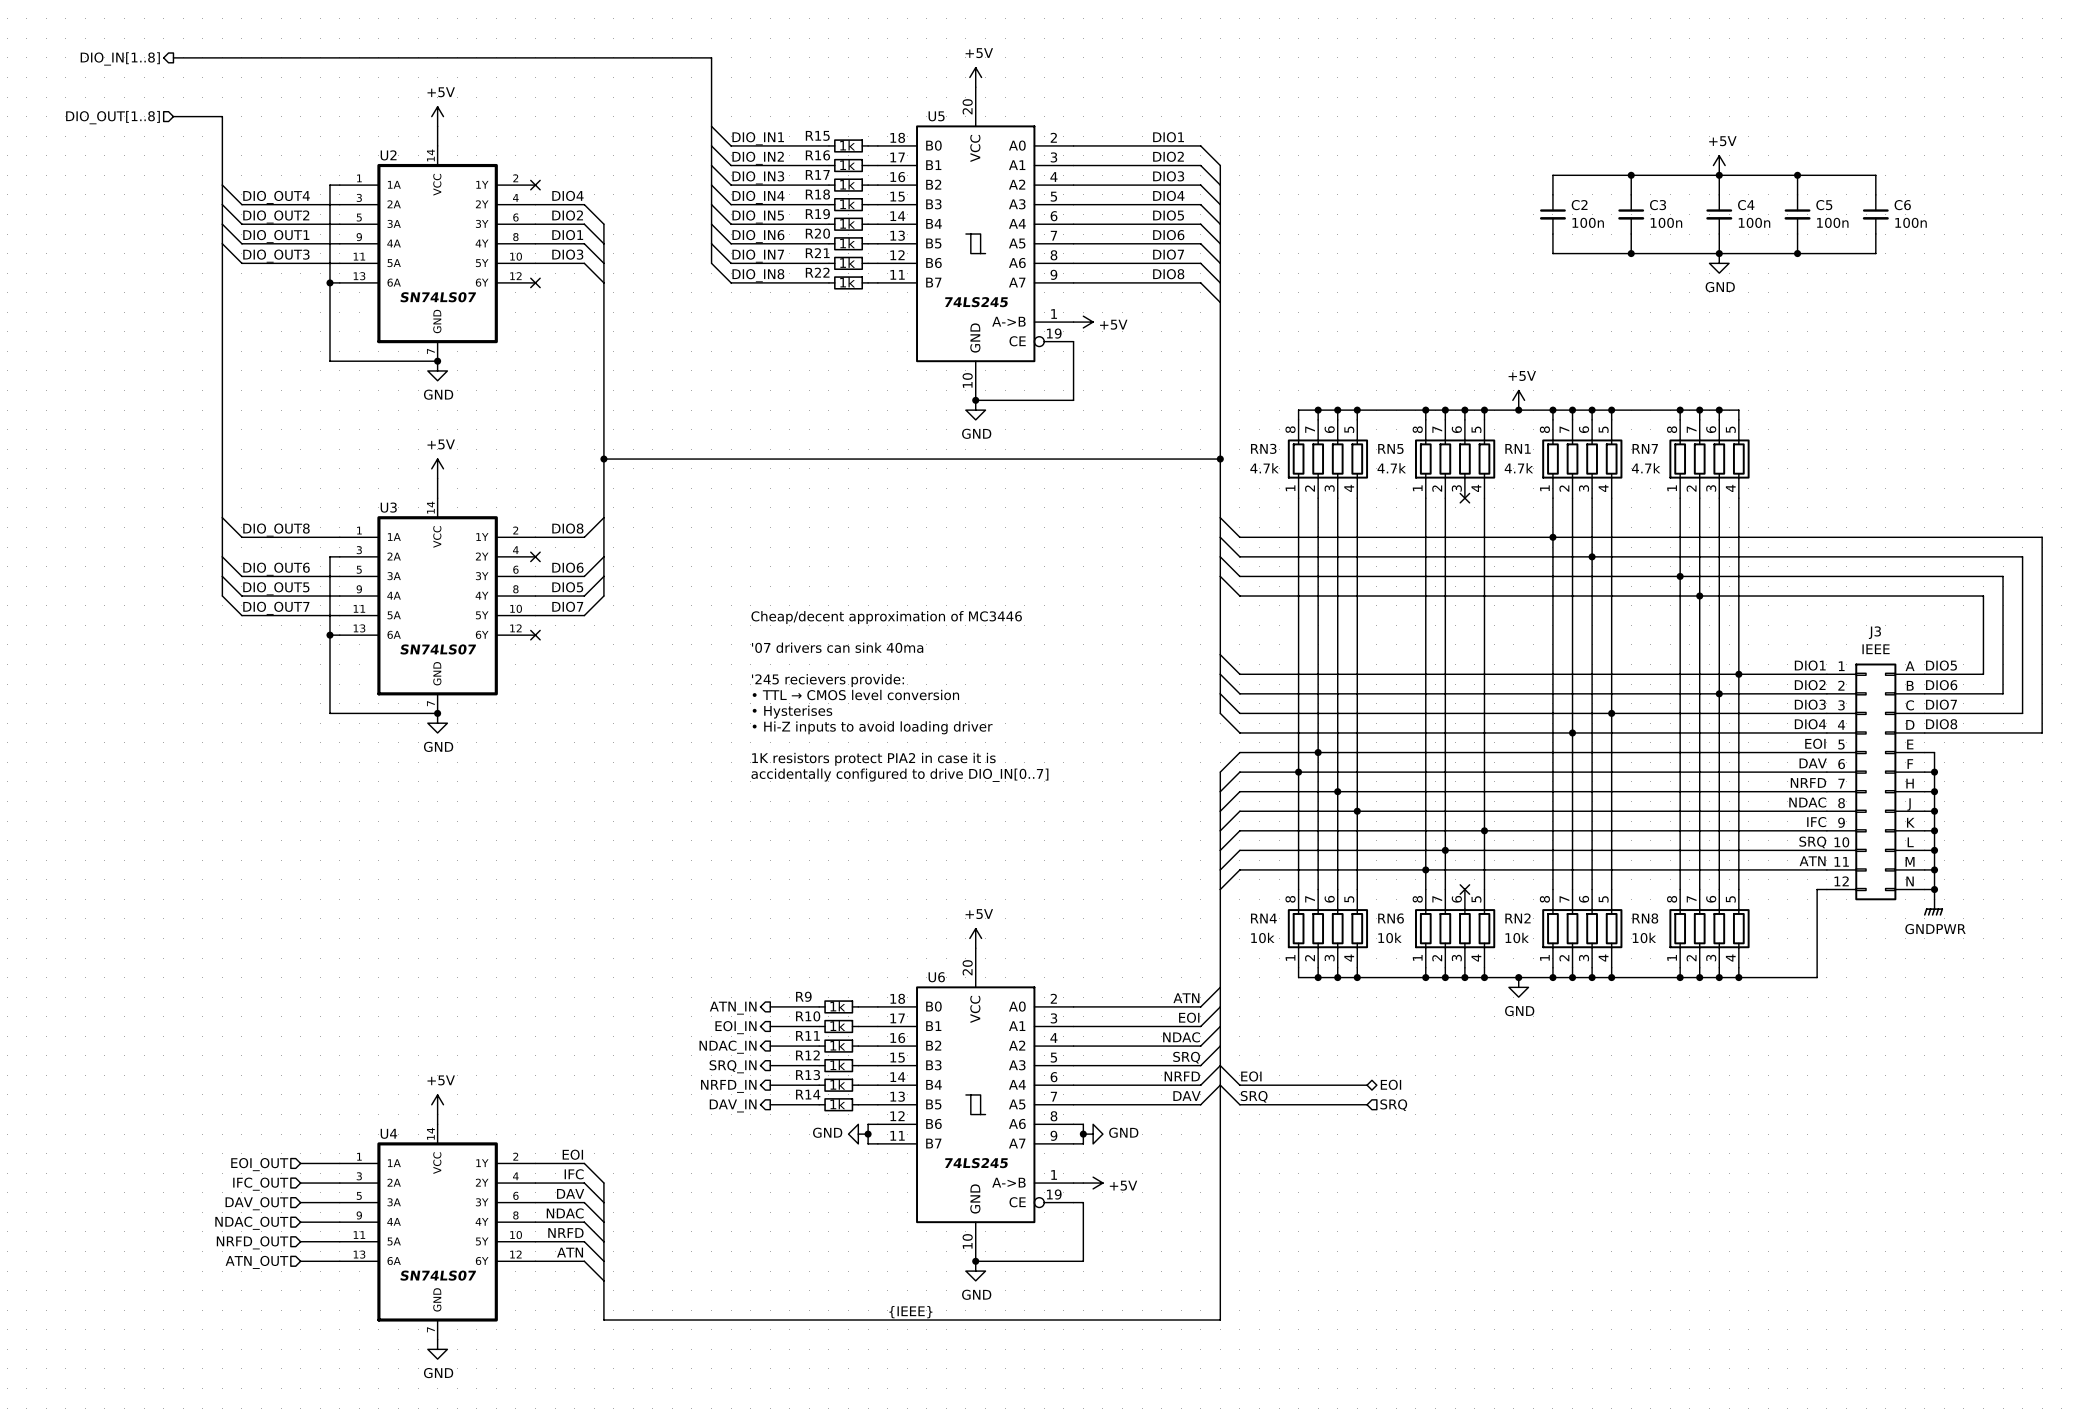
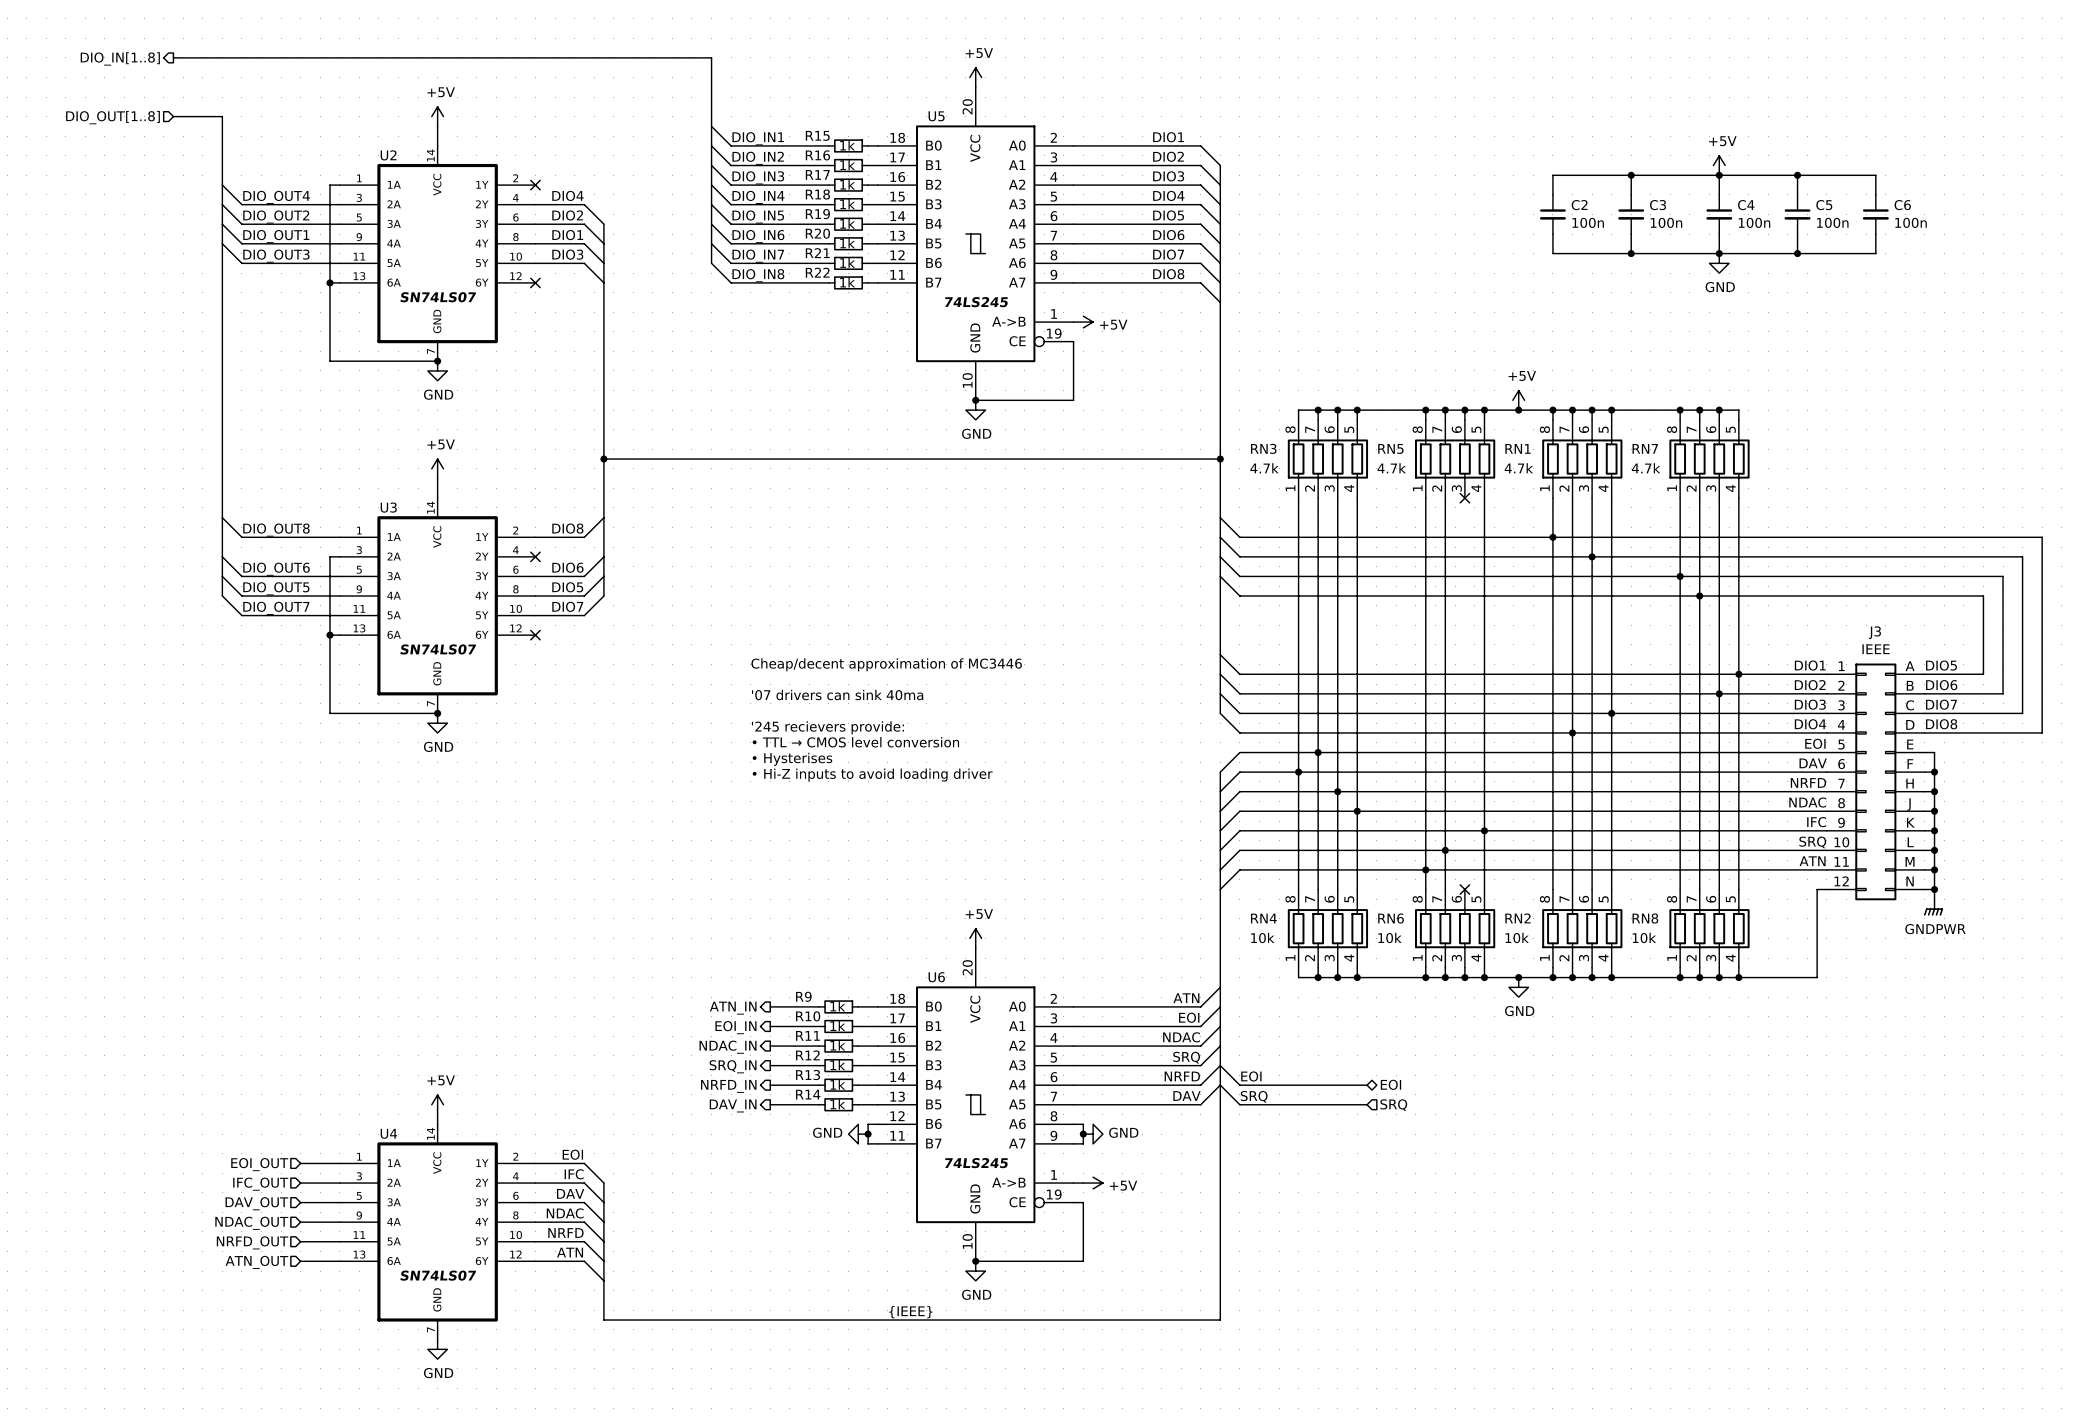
text position: Cheap/decent approximation of MC3446 (886, 617) -> Cheap/decent approximation of MC3446 (886, 664)
text: '07 drivers can sink 40ma (837, 647) -> none
text: '245 recievers provide: (828, 680) -> none
text: • TTL → CMOS level conversion (855, 695) -> '07 drivers can sink 40ma (837, 695)
text: • Hysterises (792, 712) -> none
text: • Hi-Z inputs to avoid loading driver (872, 727) -> '245 recievers provide: (828, 727)
text: none -> • TTL → CMOS level conversion (855, 742)
text: 1K resistors protect PIA2 in case it is (873, 759) -> • Hysterises (792, 759)
text: accidentally configured to drive DIO_IN[0..7] (899, 775) -> • Hi-Z inputs to avoid loading driver (872, 775)

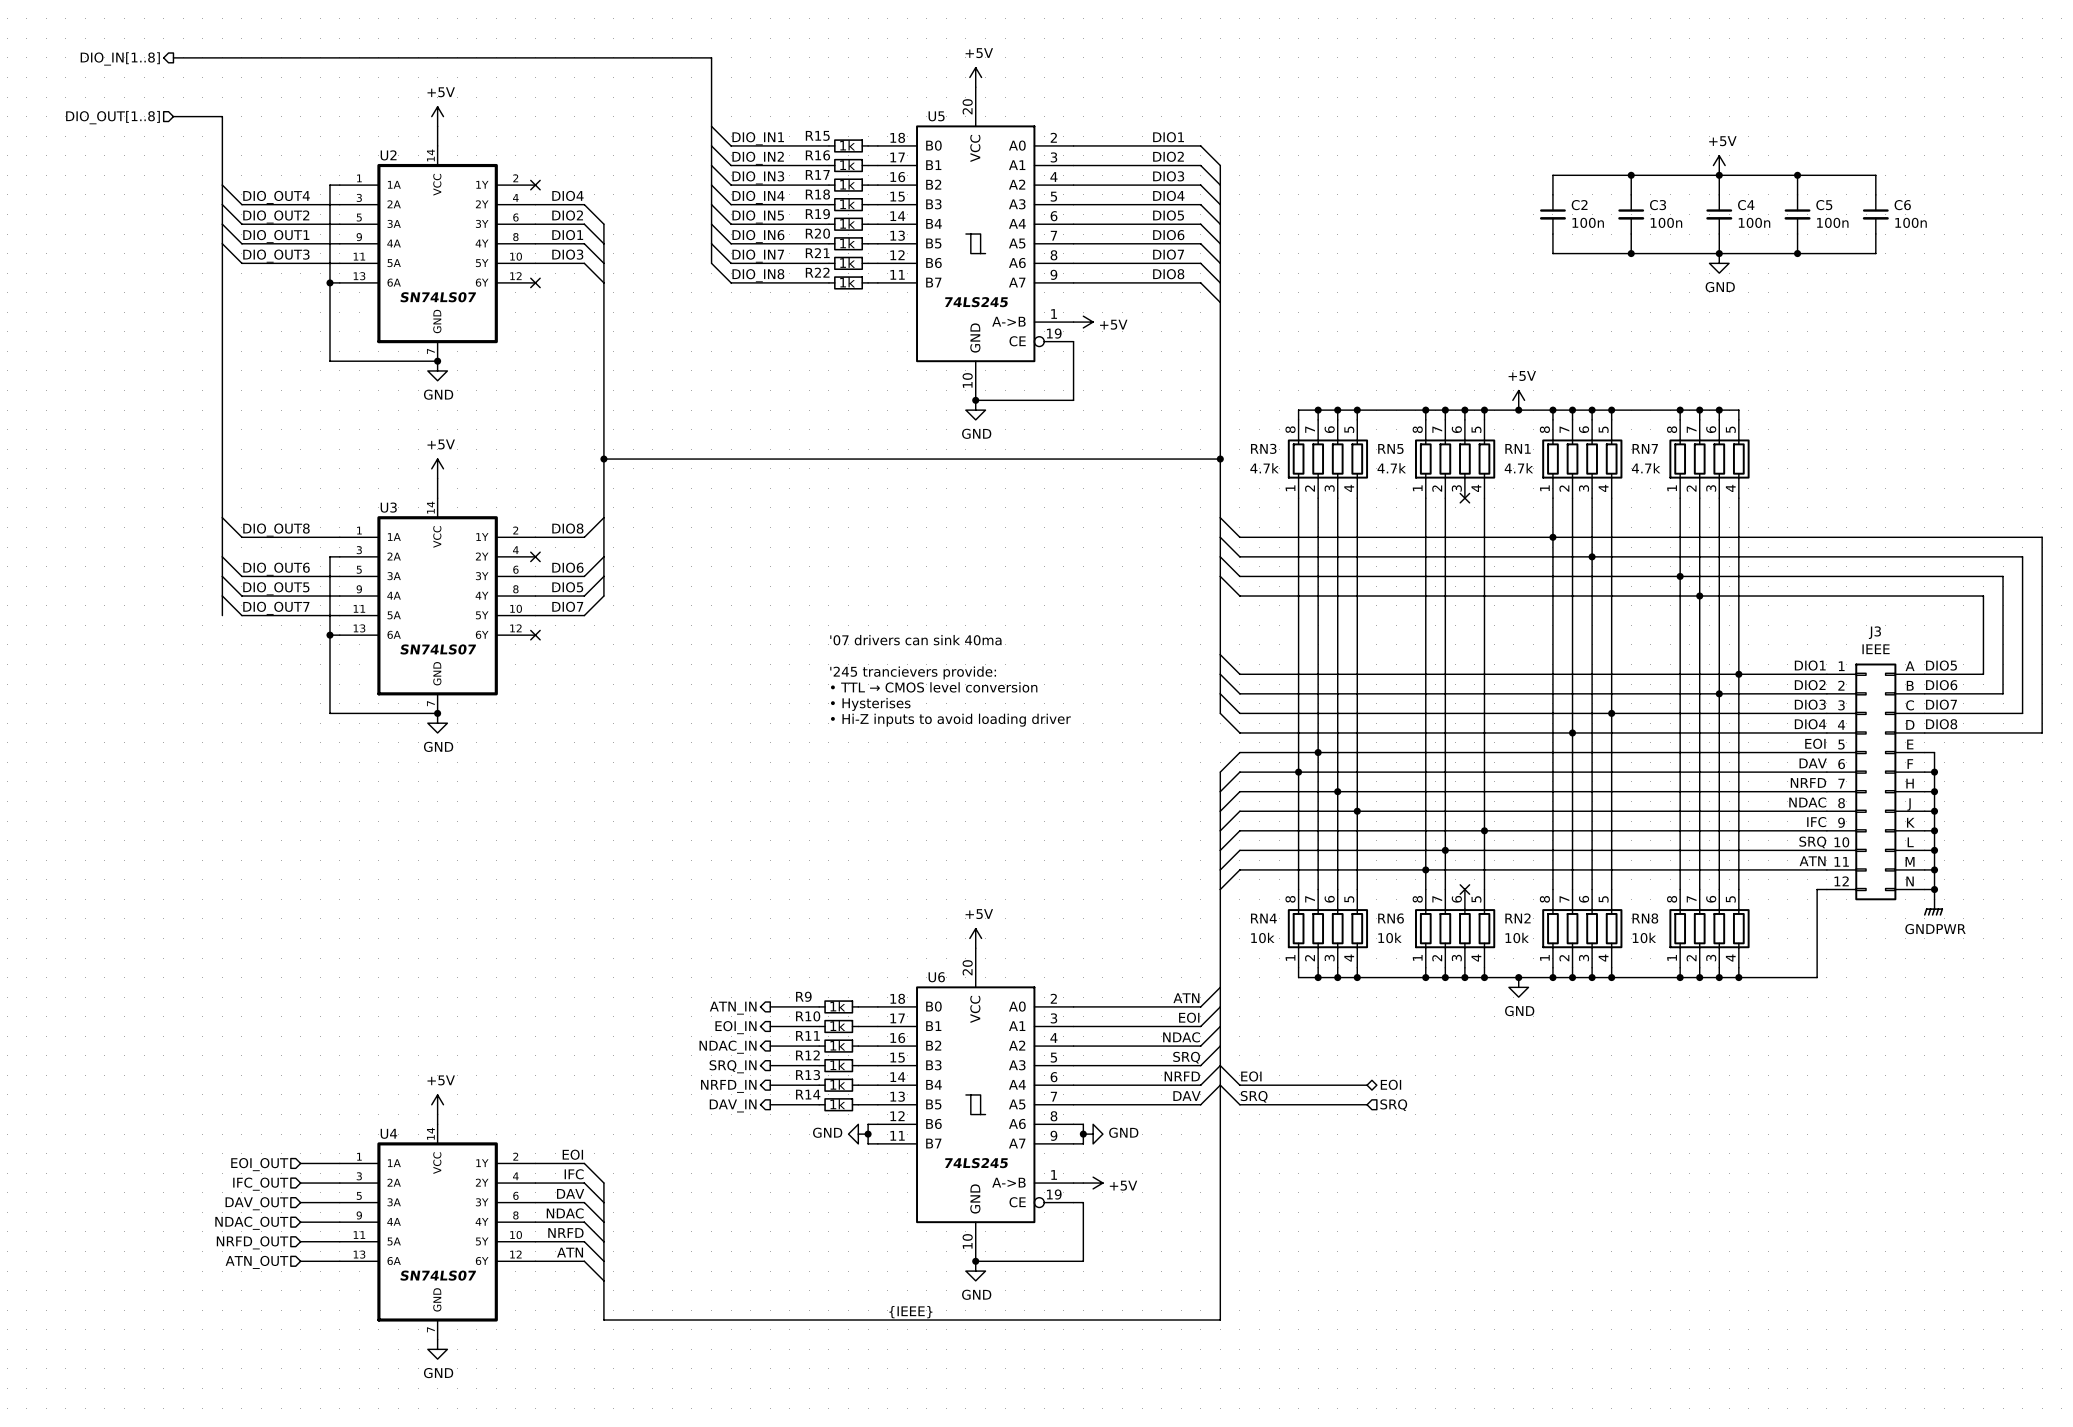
bus: none -> (222, 596) (222, 615)
text: Cheap/decent approximation of MC3446 (886, 664) -> none
text: none -> '245 trancievers provide: (913, 672)
text position: '07 drivers can sink 40ma (837, 695) -> '07 drivers can sink 40ma (915, 640)
text: '245 recievers provide: (828, 727) -> none
text position: • TTL → CMOS level conversion (855, 742) -> • TTL → CMOS level conversion (934, 687)
text position: • Hysterises (792, 759) -> • Hysterises (870, 704)
text position: • Hi-Z inputs to avoid loading driver (872, 775) -> • Hi-Z inputs to avoid loading driver (950, 720)

